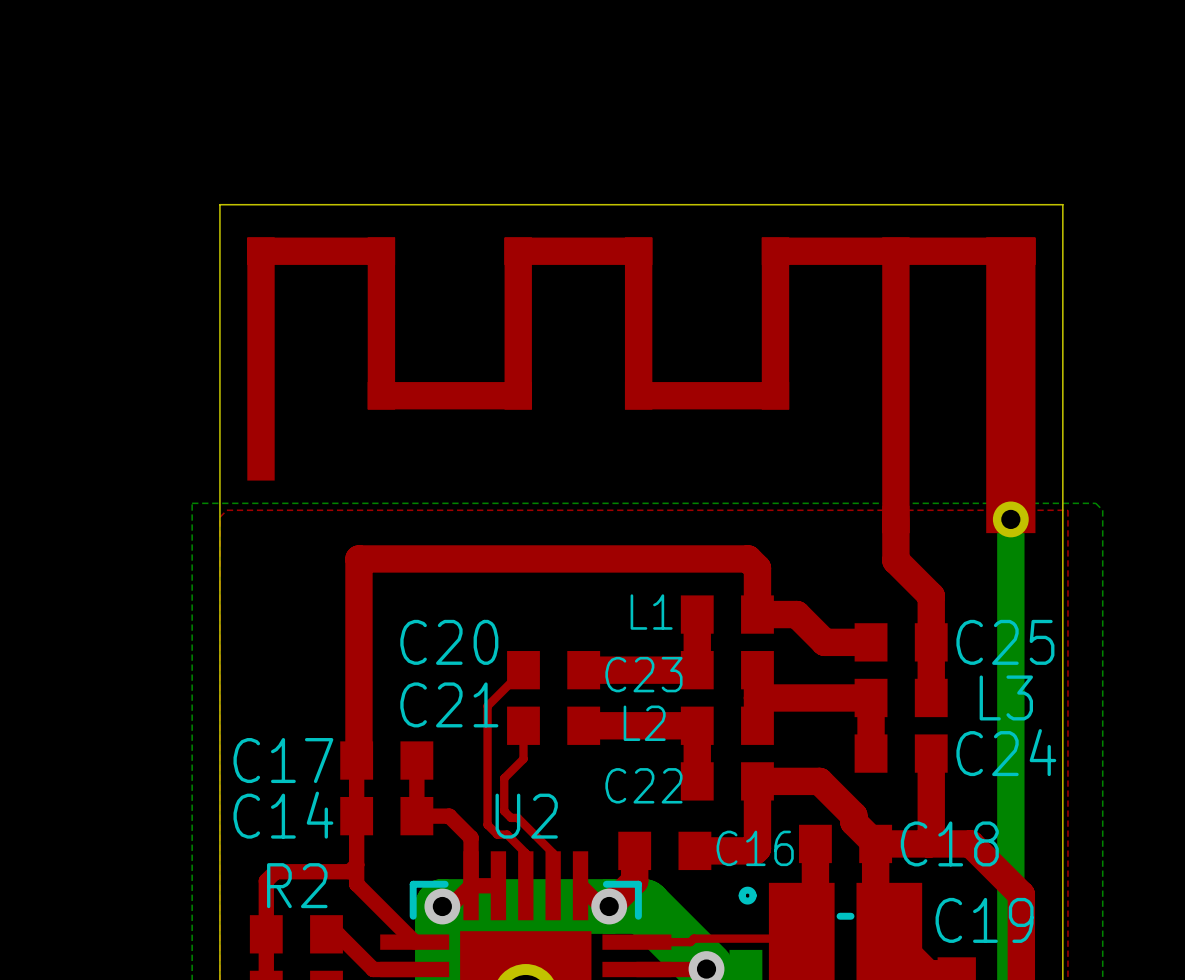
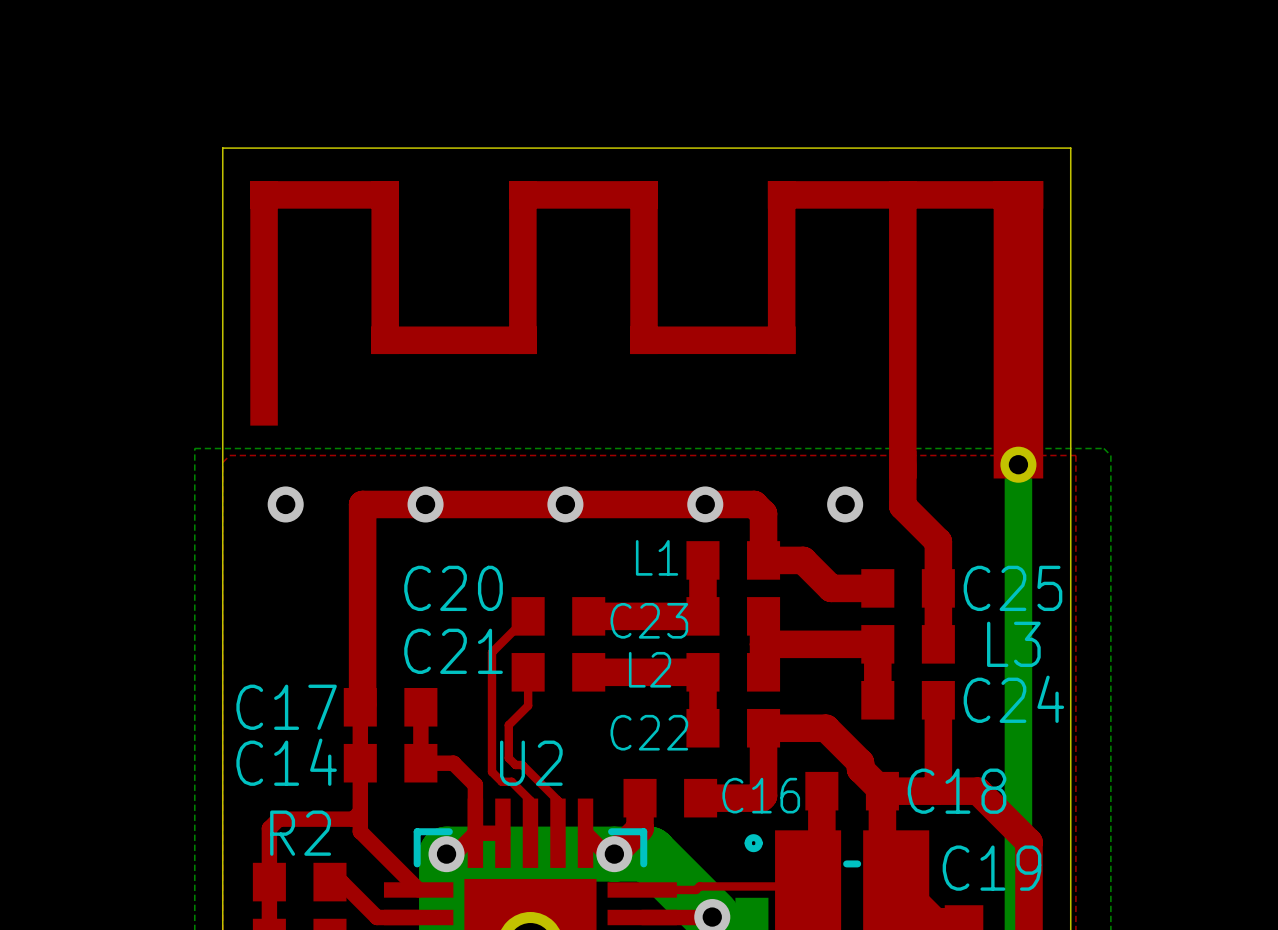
via: none -> (285, 504)
via: none -> (425, 504)
via: none -> (565, 504)
via: none -> (705, 504)
via: none -> (845, 504)

